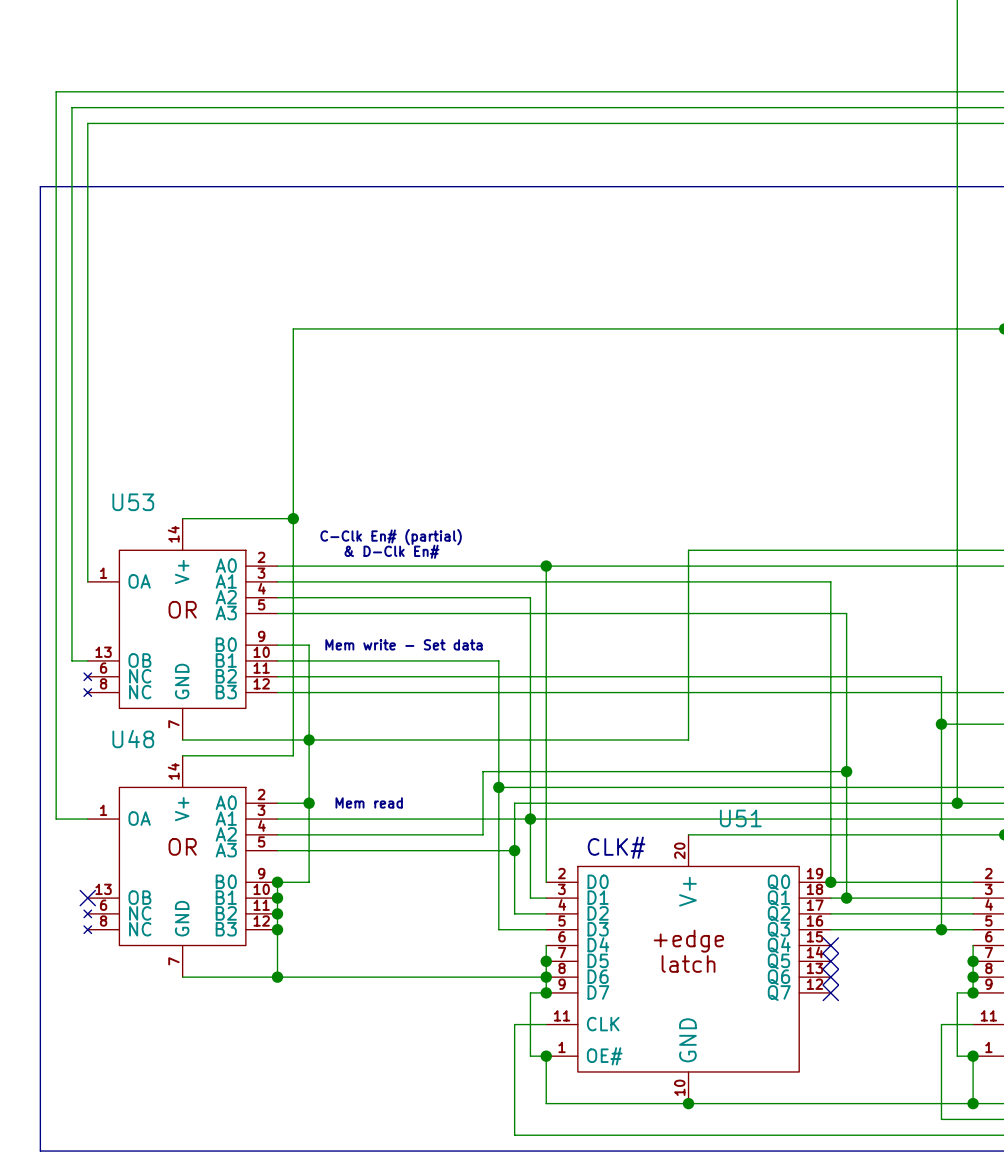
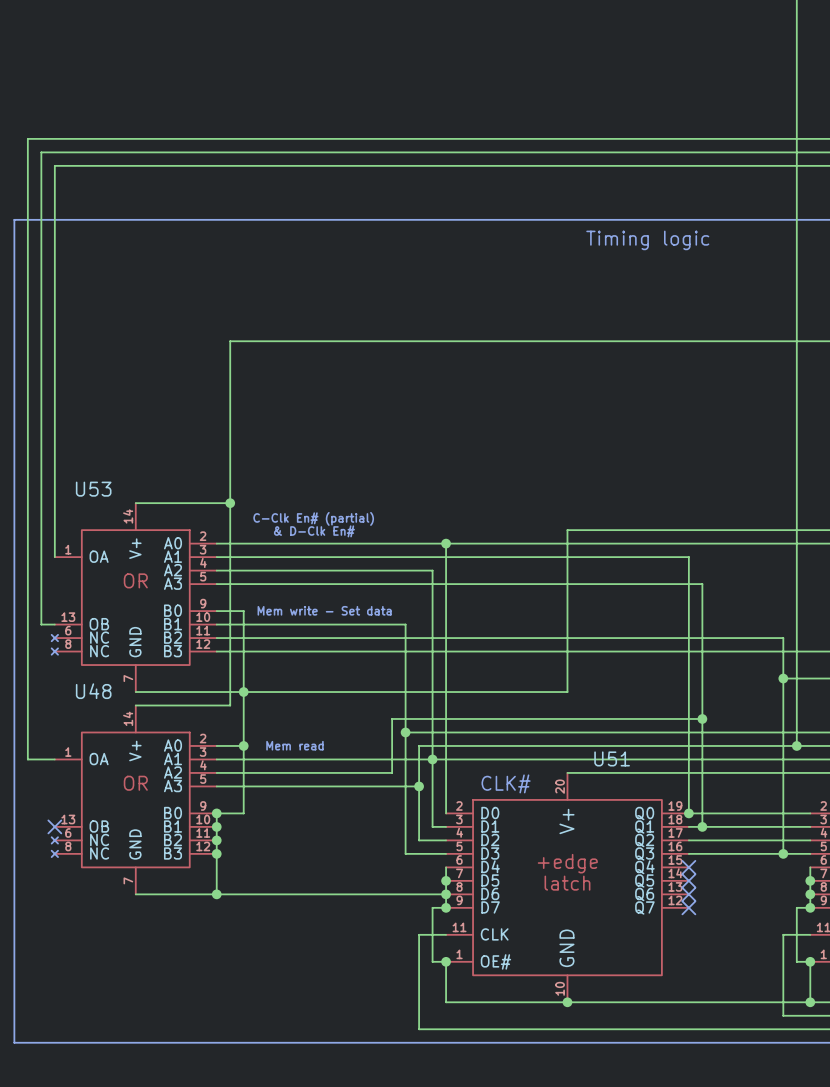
text: none -> Timing logic (647, 240)

